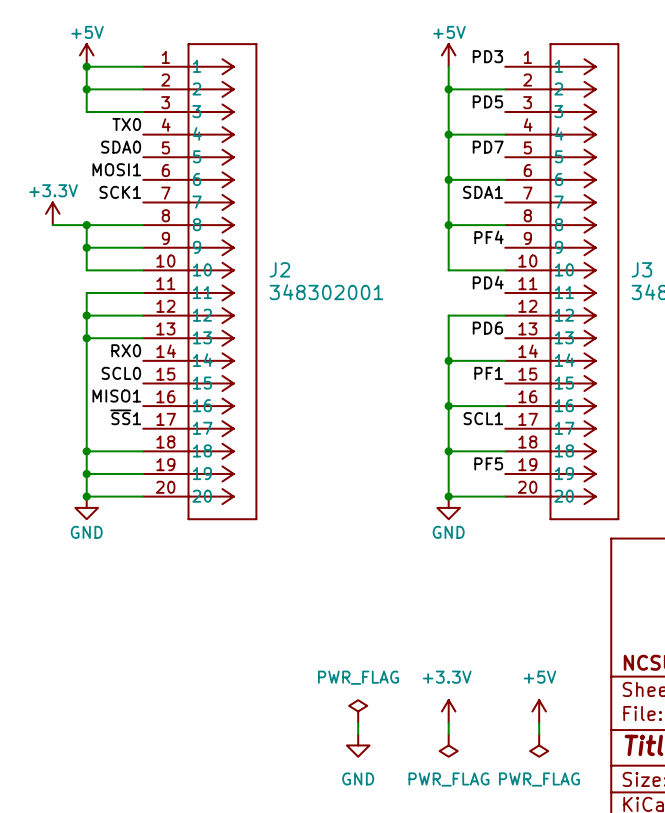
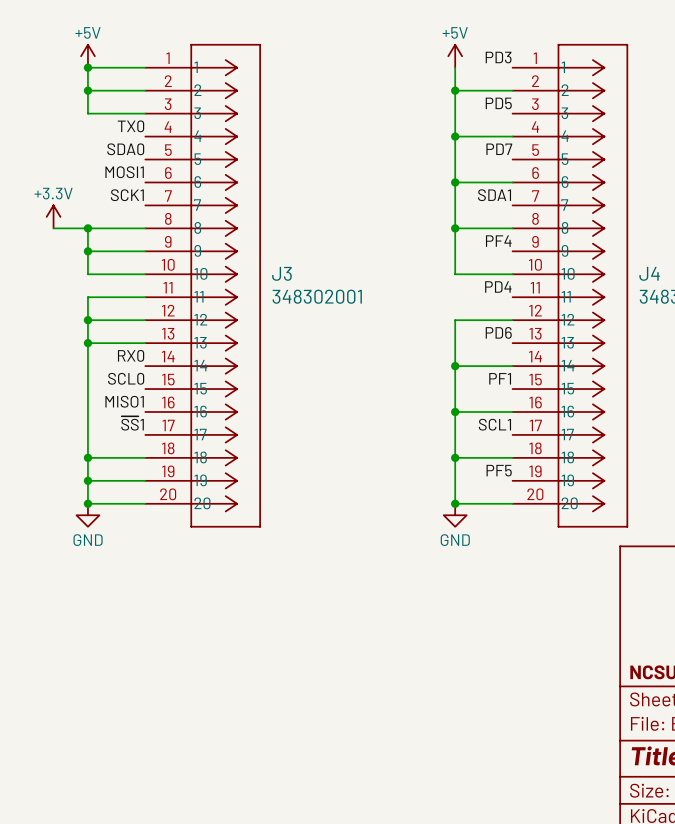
J2 name: J2 (279, 269) -> J3 (281, 273)
J3 name: J3 (641, 269) -> J4 (649, 273)
power symbol: PWR_FLAG (358, 711) -> none
power symbol: +3.3V (448, 711) -> none
power symbol: +5V (539, 711) -> none
wire: (358, 722) (358, 734) -> none
wire: (448, 722) (448, 734) -> none
wire: (539, 722) (539, 734) -> none
power symbol: GND (358, 745) -> none
power symbol: PWR_FLAG (448, 745) -> none
power symbol: PWR_FLAG (539, 745) -> none

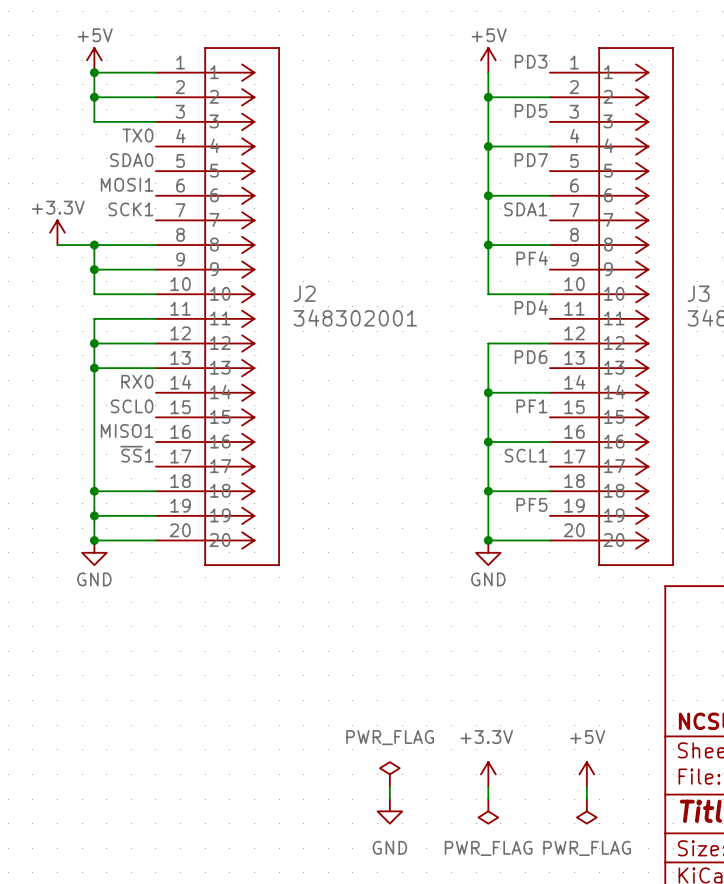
J3 name: J3 (281, 273) -> J2 (304, 293)
J4 name: J4 (649, 273) -> J3 (698, 293)
power symbol: none -> PWR_FLAG (389, 774)
power symbol: none -> +3.3V (488, 774)
power symbol: none -> +5V (586, 774)
wire: none -> (389, 786) (389, 799)
wire: none -> (488, 786) (488, 799)
wire: none -> (586, 786) (586, 799)
power symbol: none -> GND (389, 811)
power symbol: none -> PWR_FLAG (488, 811)
power symbol: none -> PWR_FLAG (586, 811)

